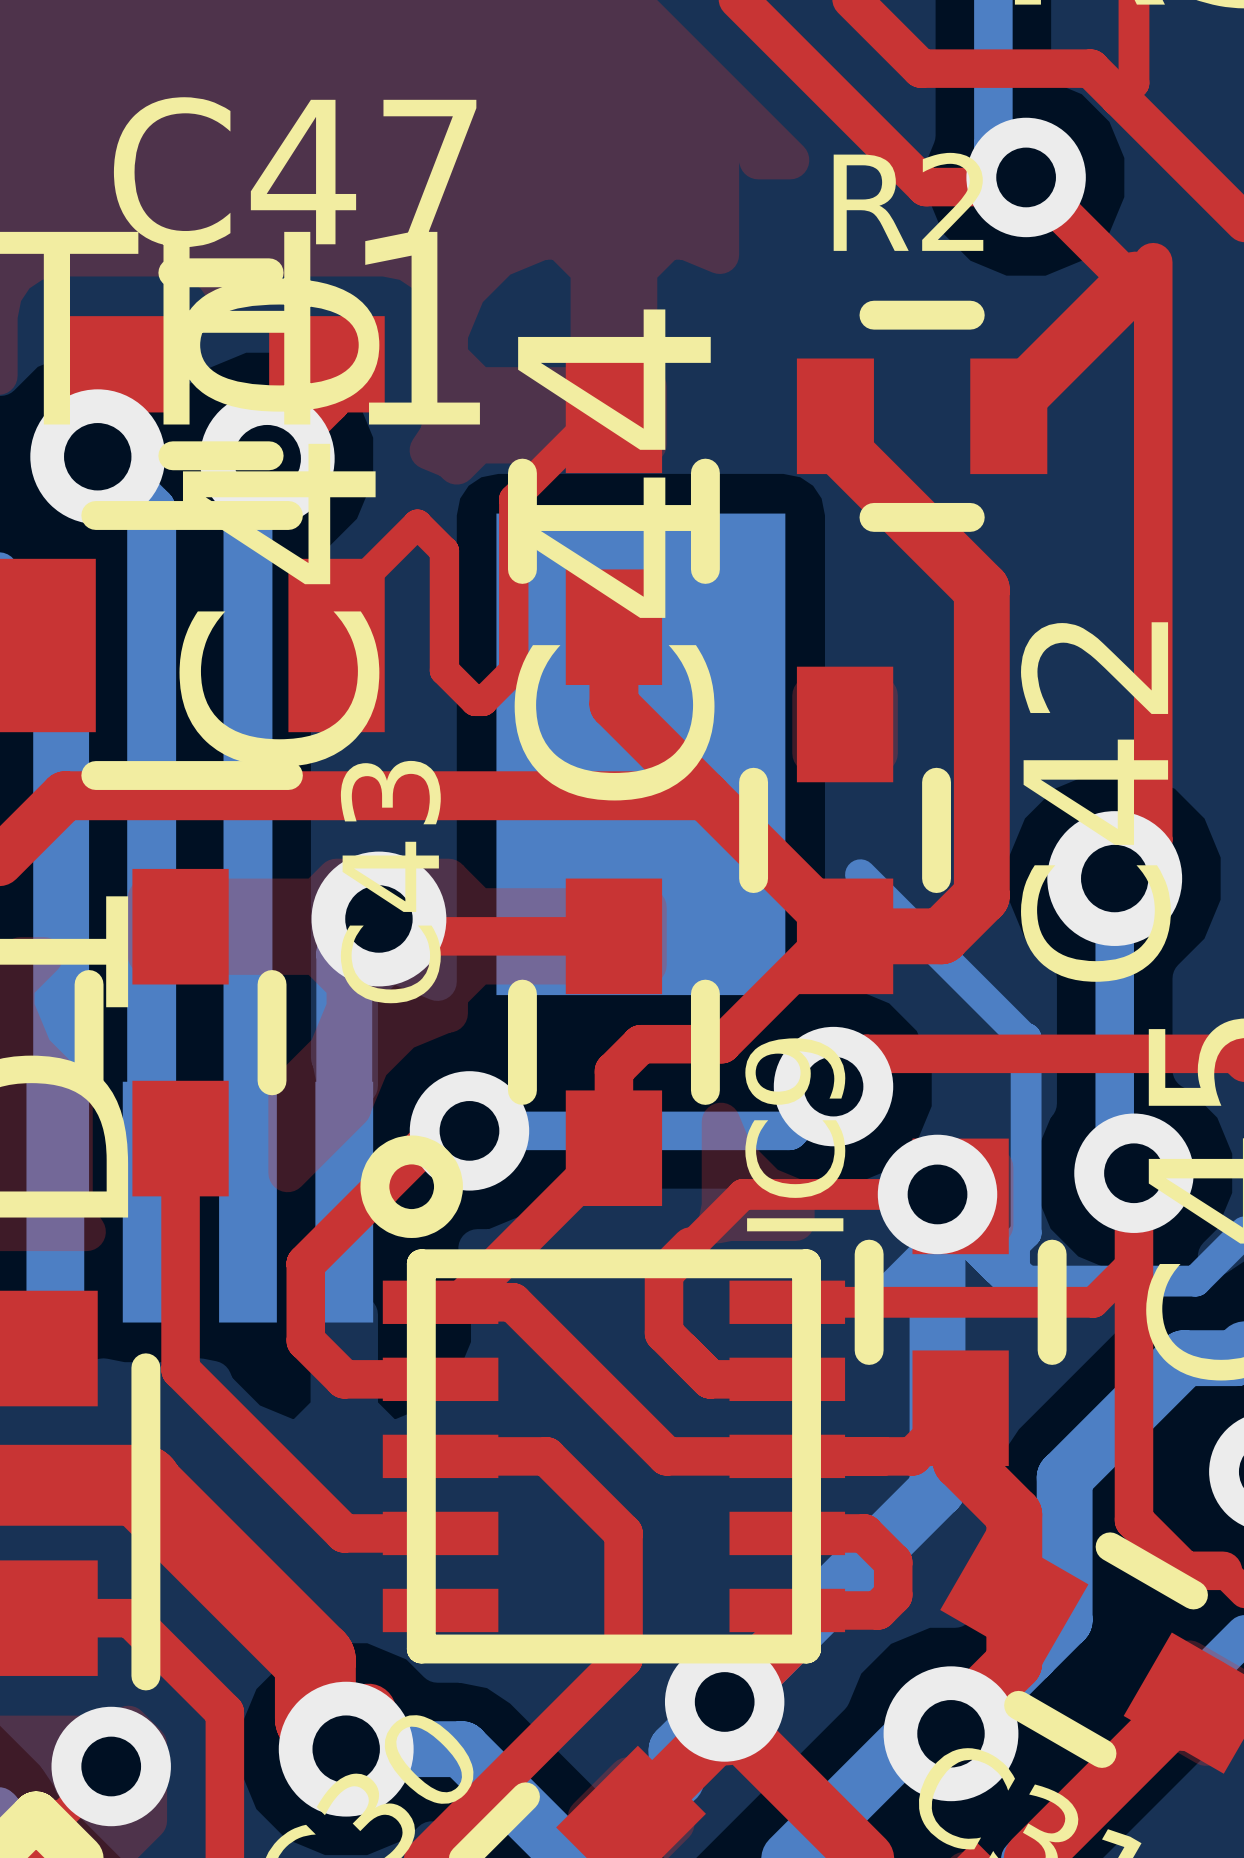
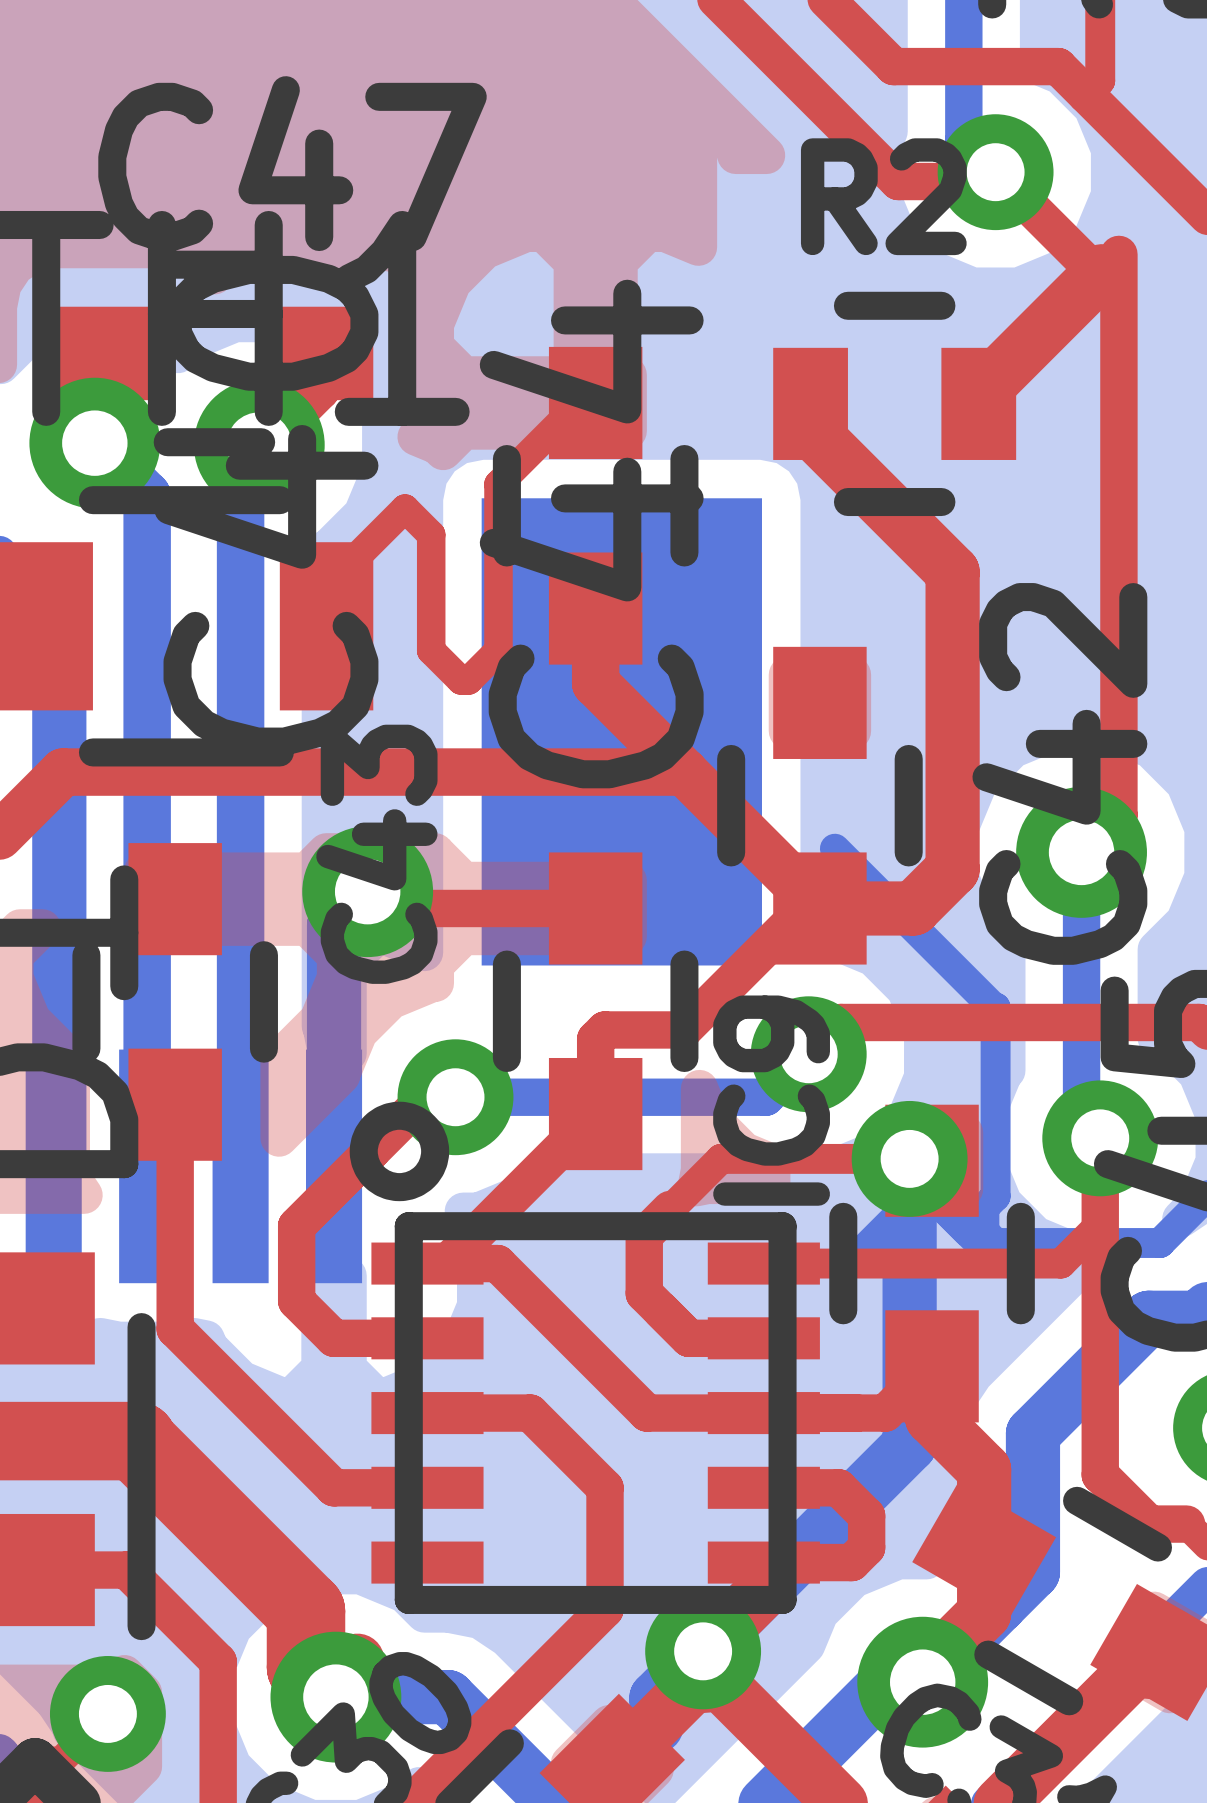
top track: (721, 1044) (640, 1044) (623, 1061) -> (700, 1013) (683, 1029) (605, 1029)

